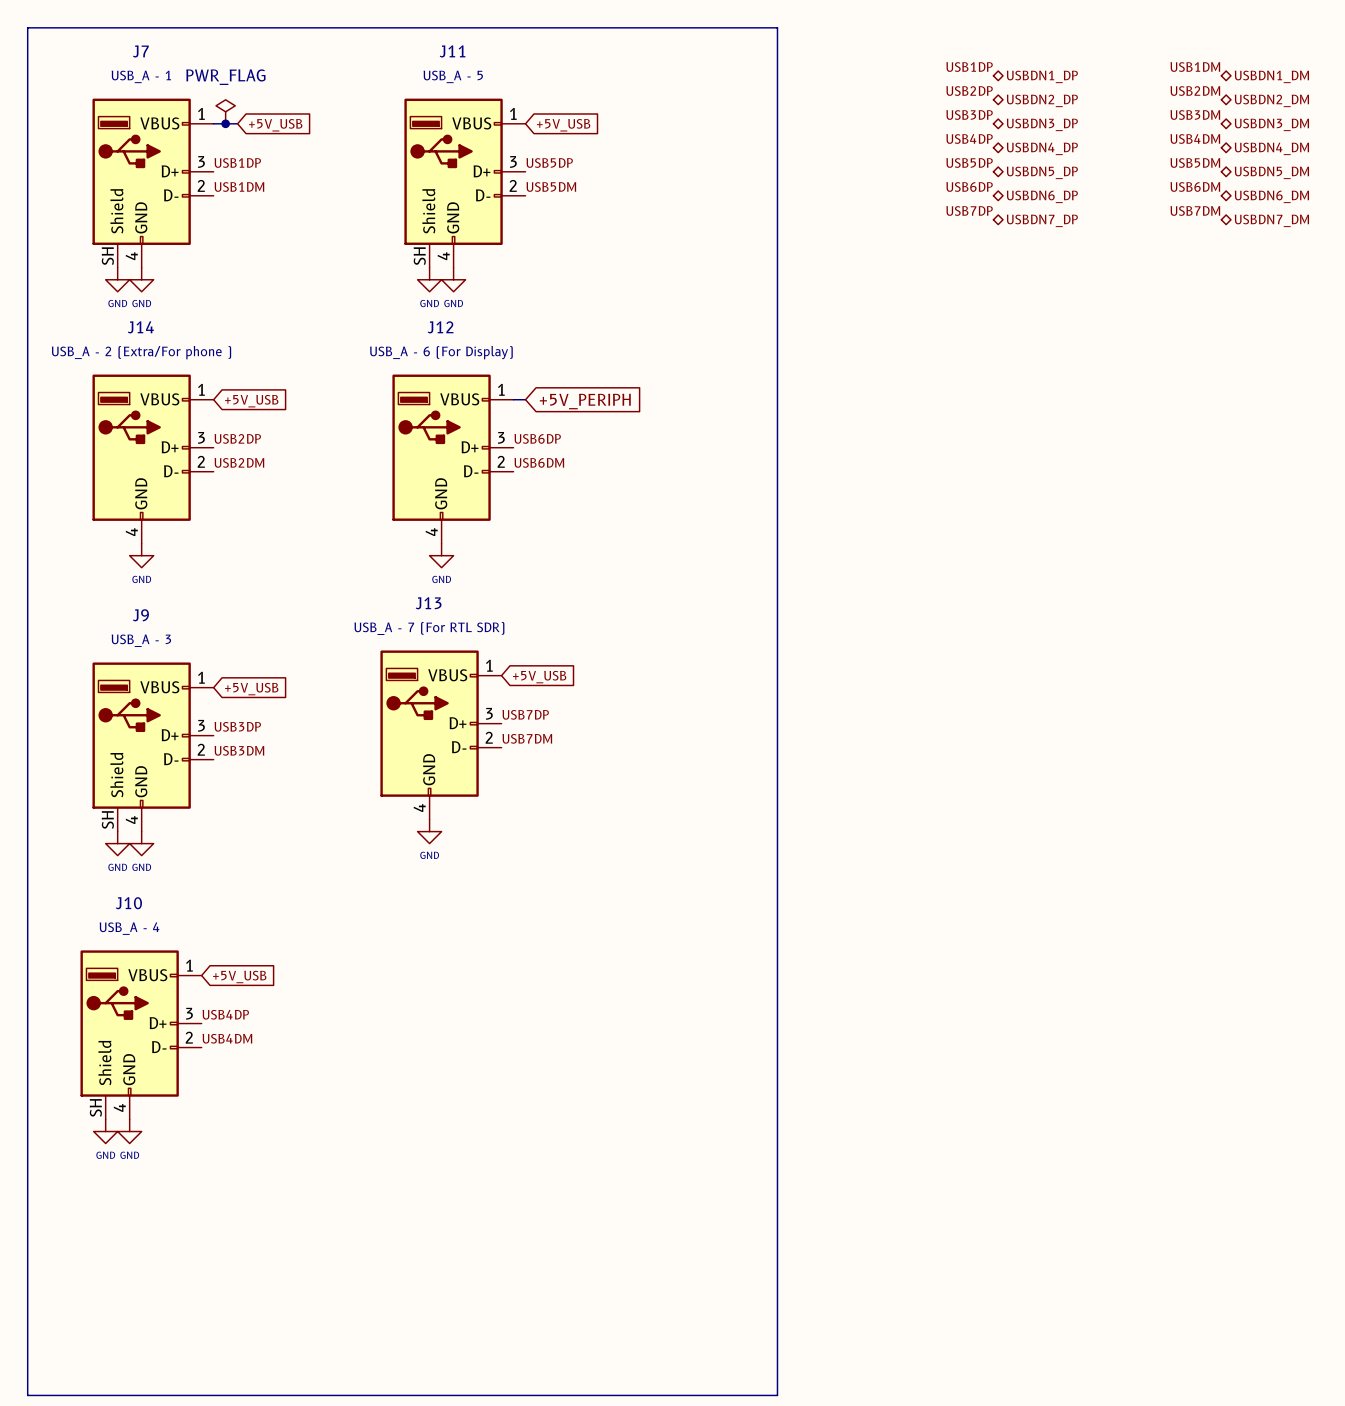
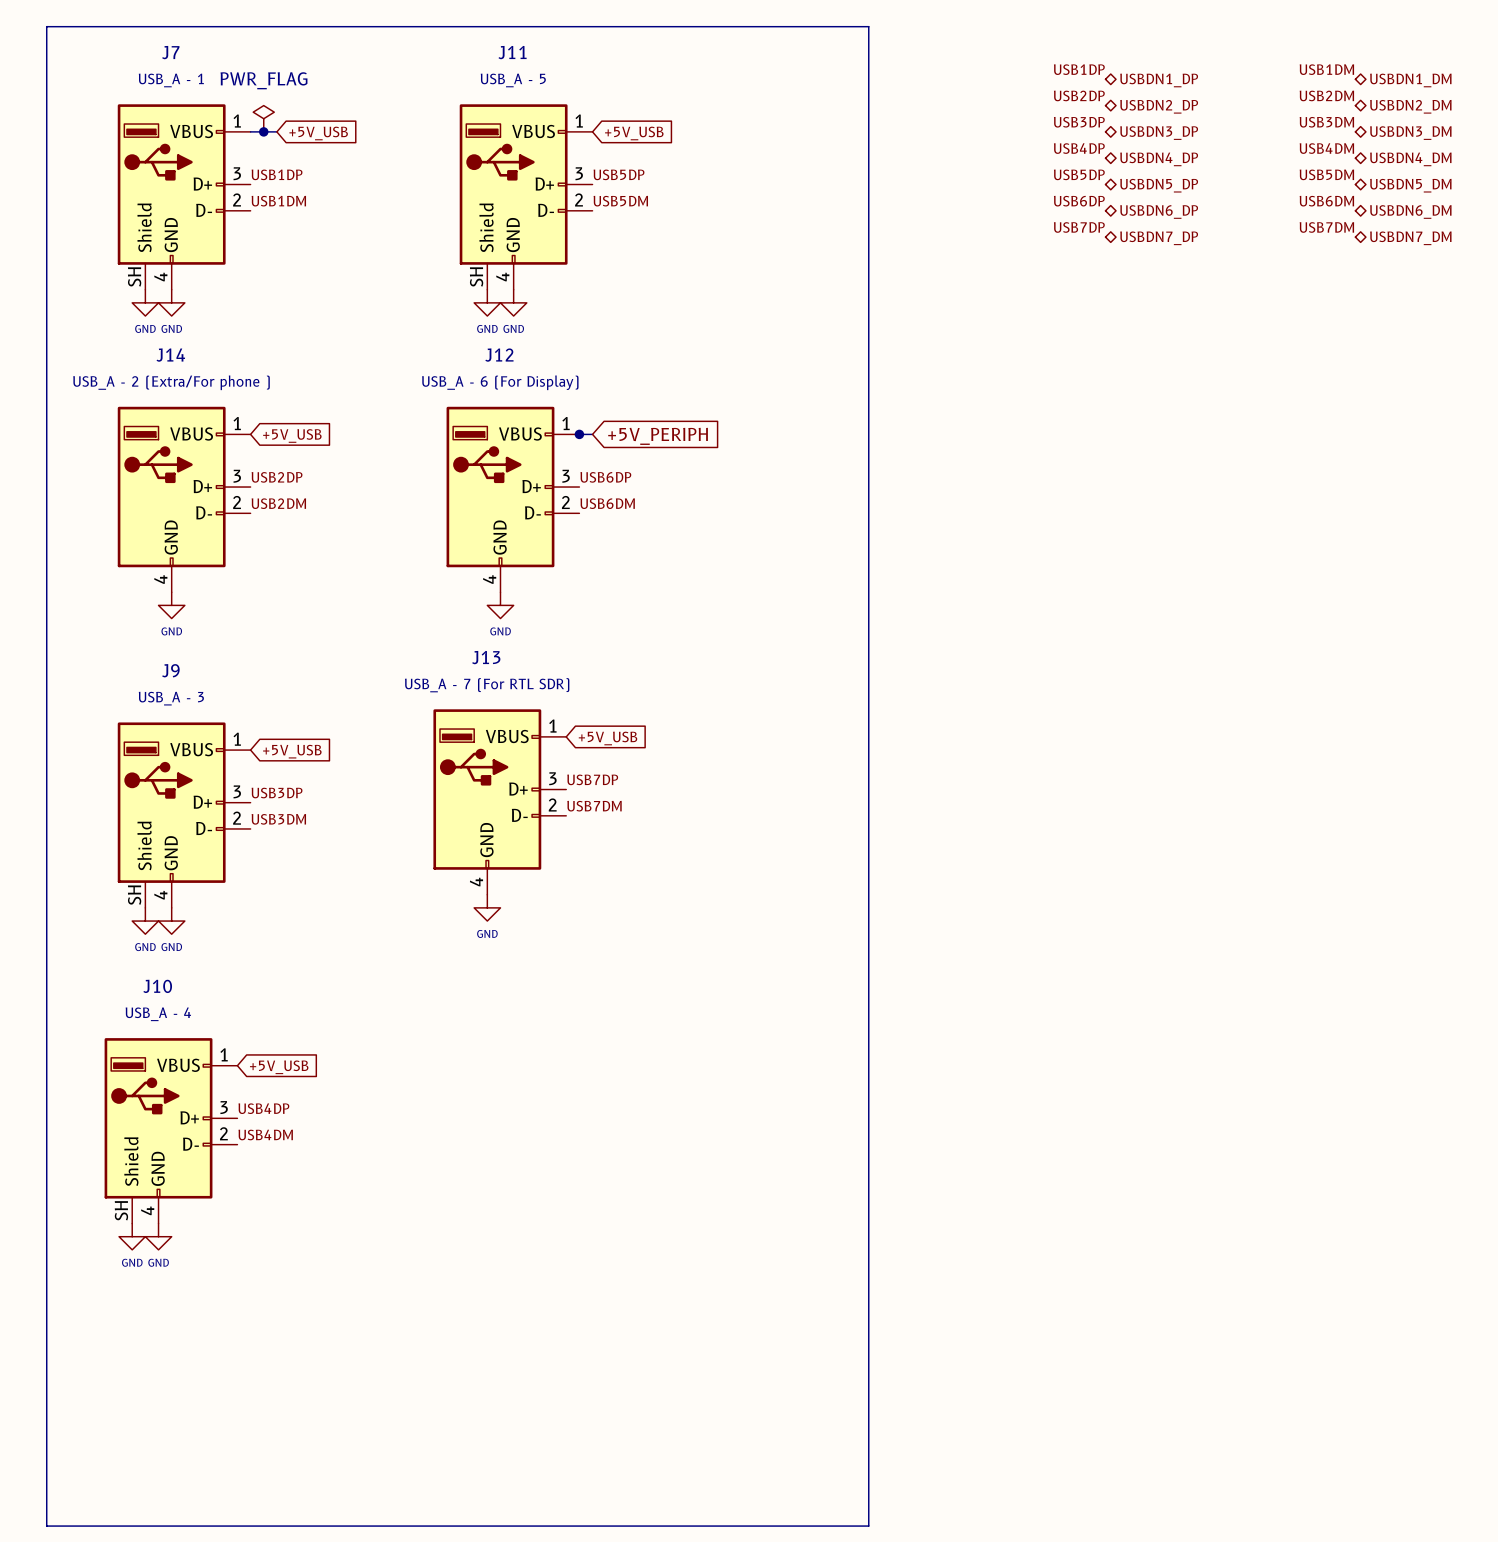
junction: none -> (579, 434)

